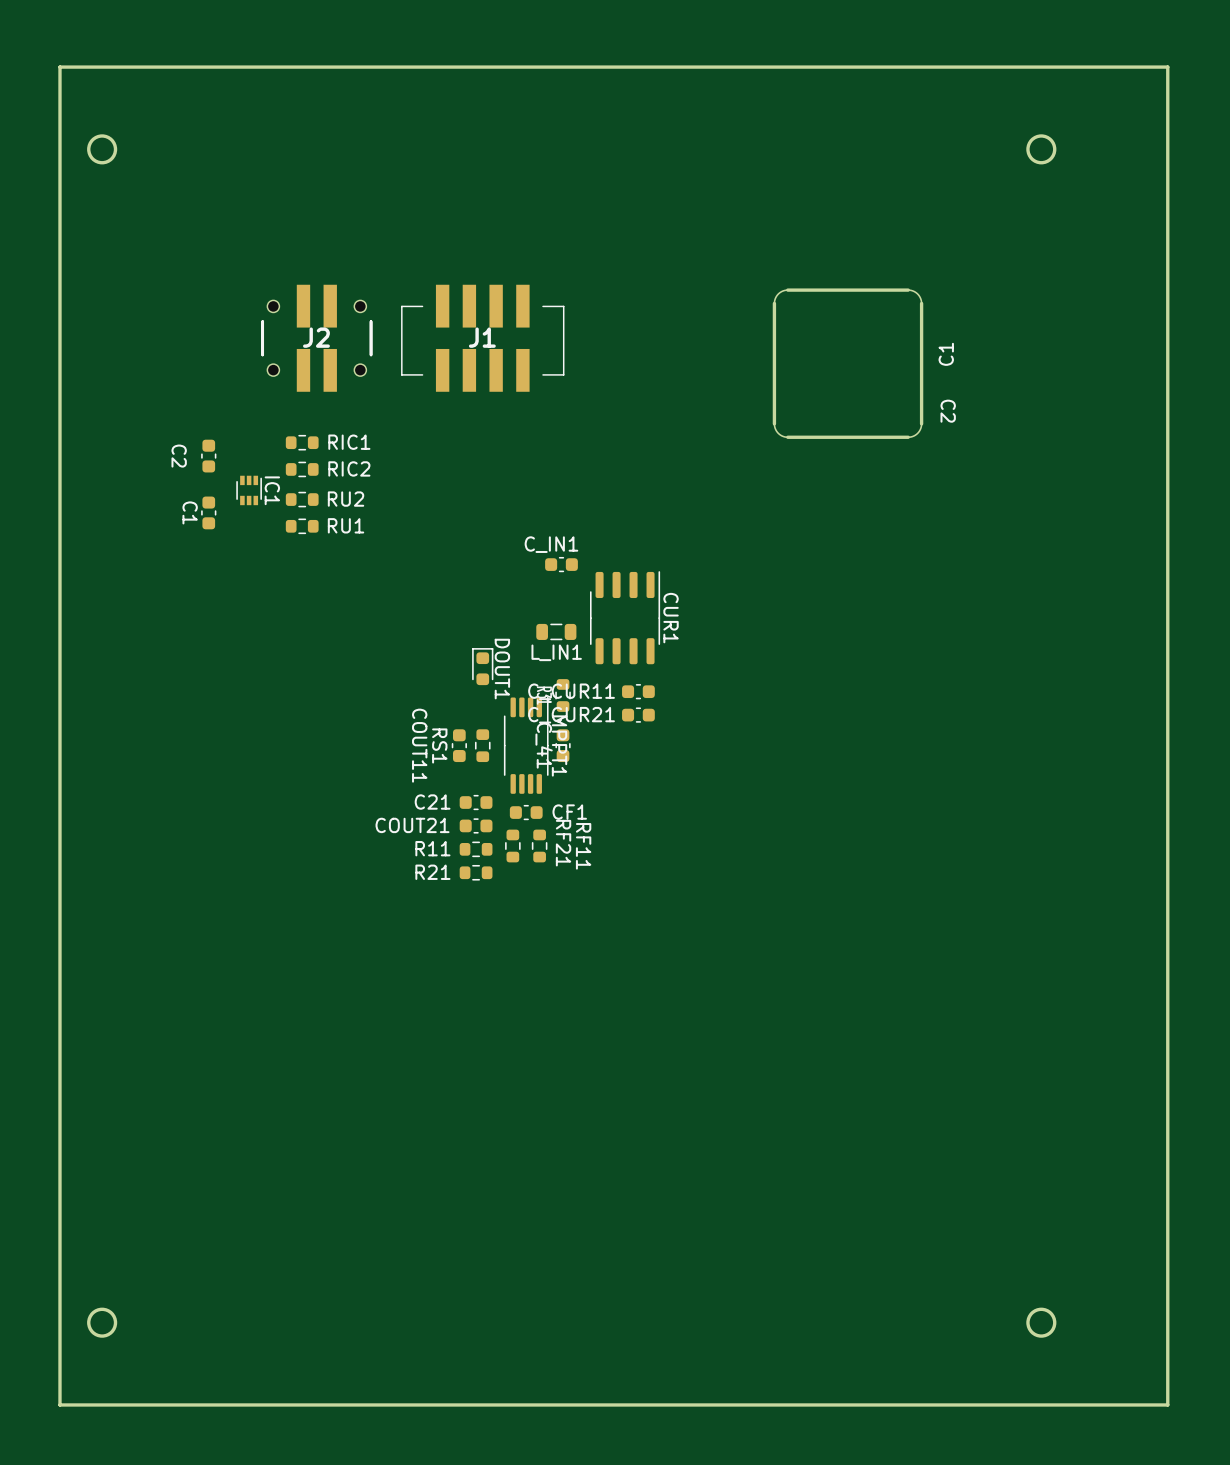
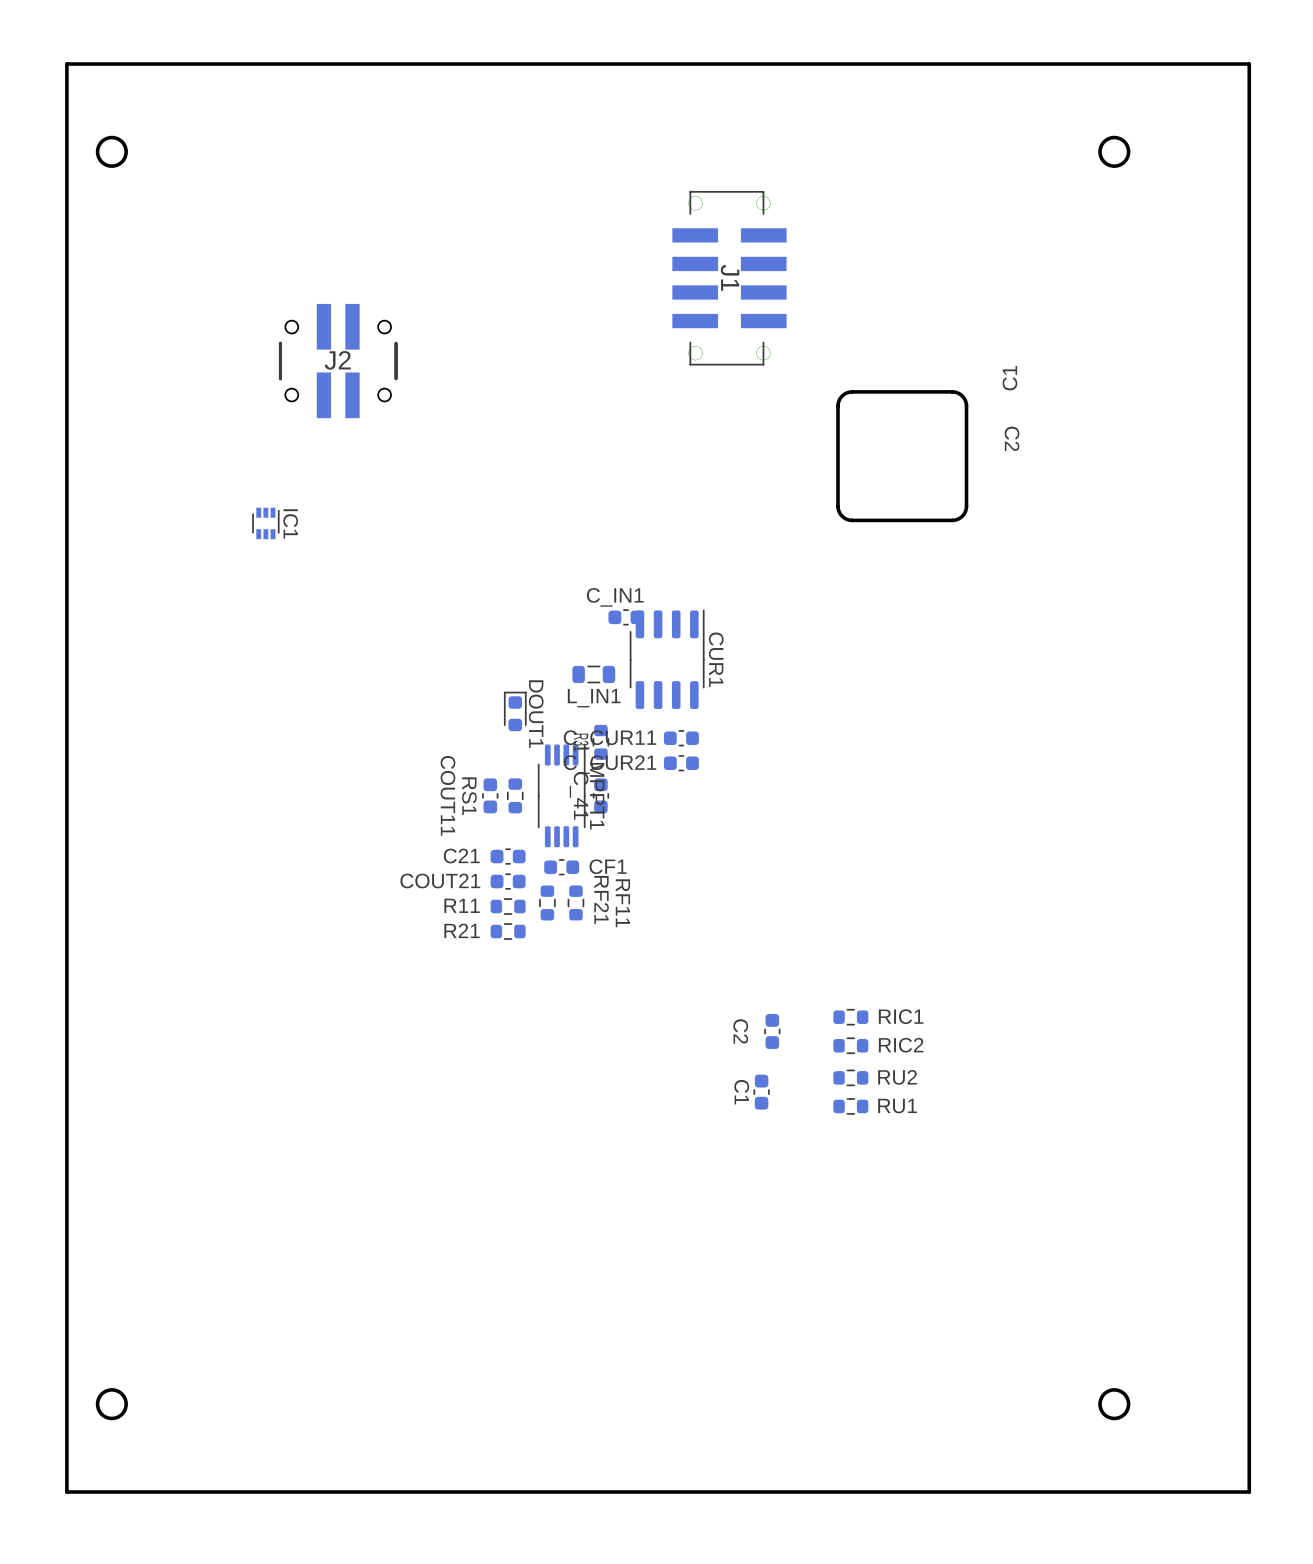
drawing shape: [58, 65, 1170, 1407] -> [65, 62, 1252, 1494]
J1 footprint: [401, 284, 565, 392] -> [672, 191, 787, 366]
RIC1 position: (302, 442) -> (850, 1017)
C2 position: (208, 456) -> (772, 1031)
RIC2 position: (302, 469) -> (850, 1045)
RU2 position: (302, 499) -> (850, 1077)
C1 position: (208, 512) -> (761, 1092)
RU1 position: (302, 526) -> (850, 1106)
C_IN1 position: (561, 564) -> (625, 617)

